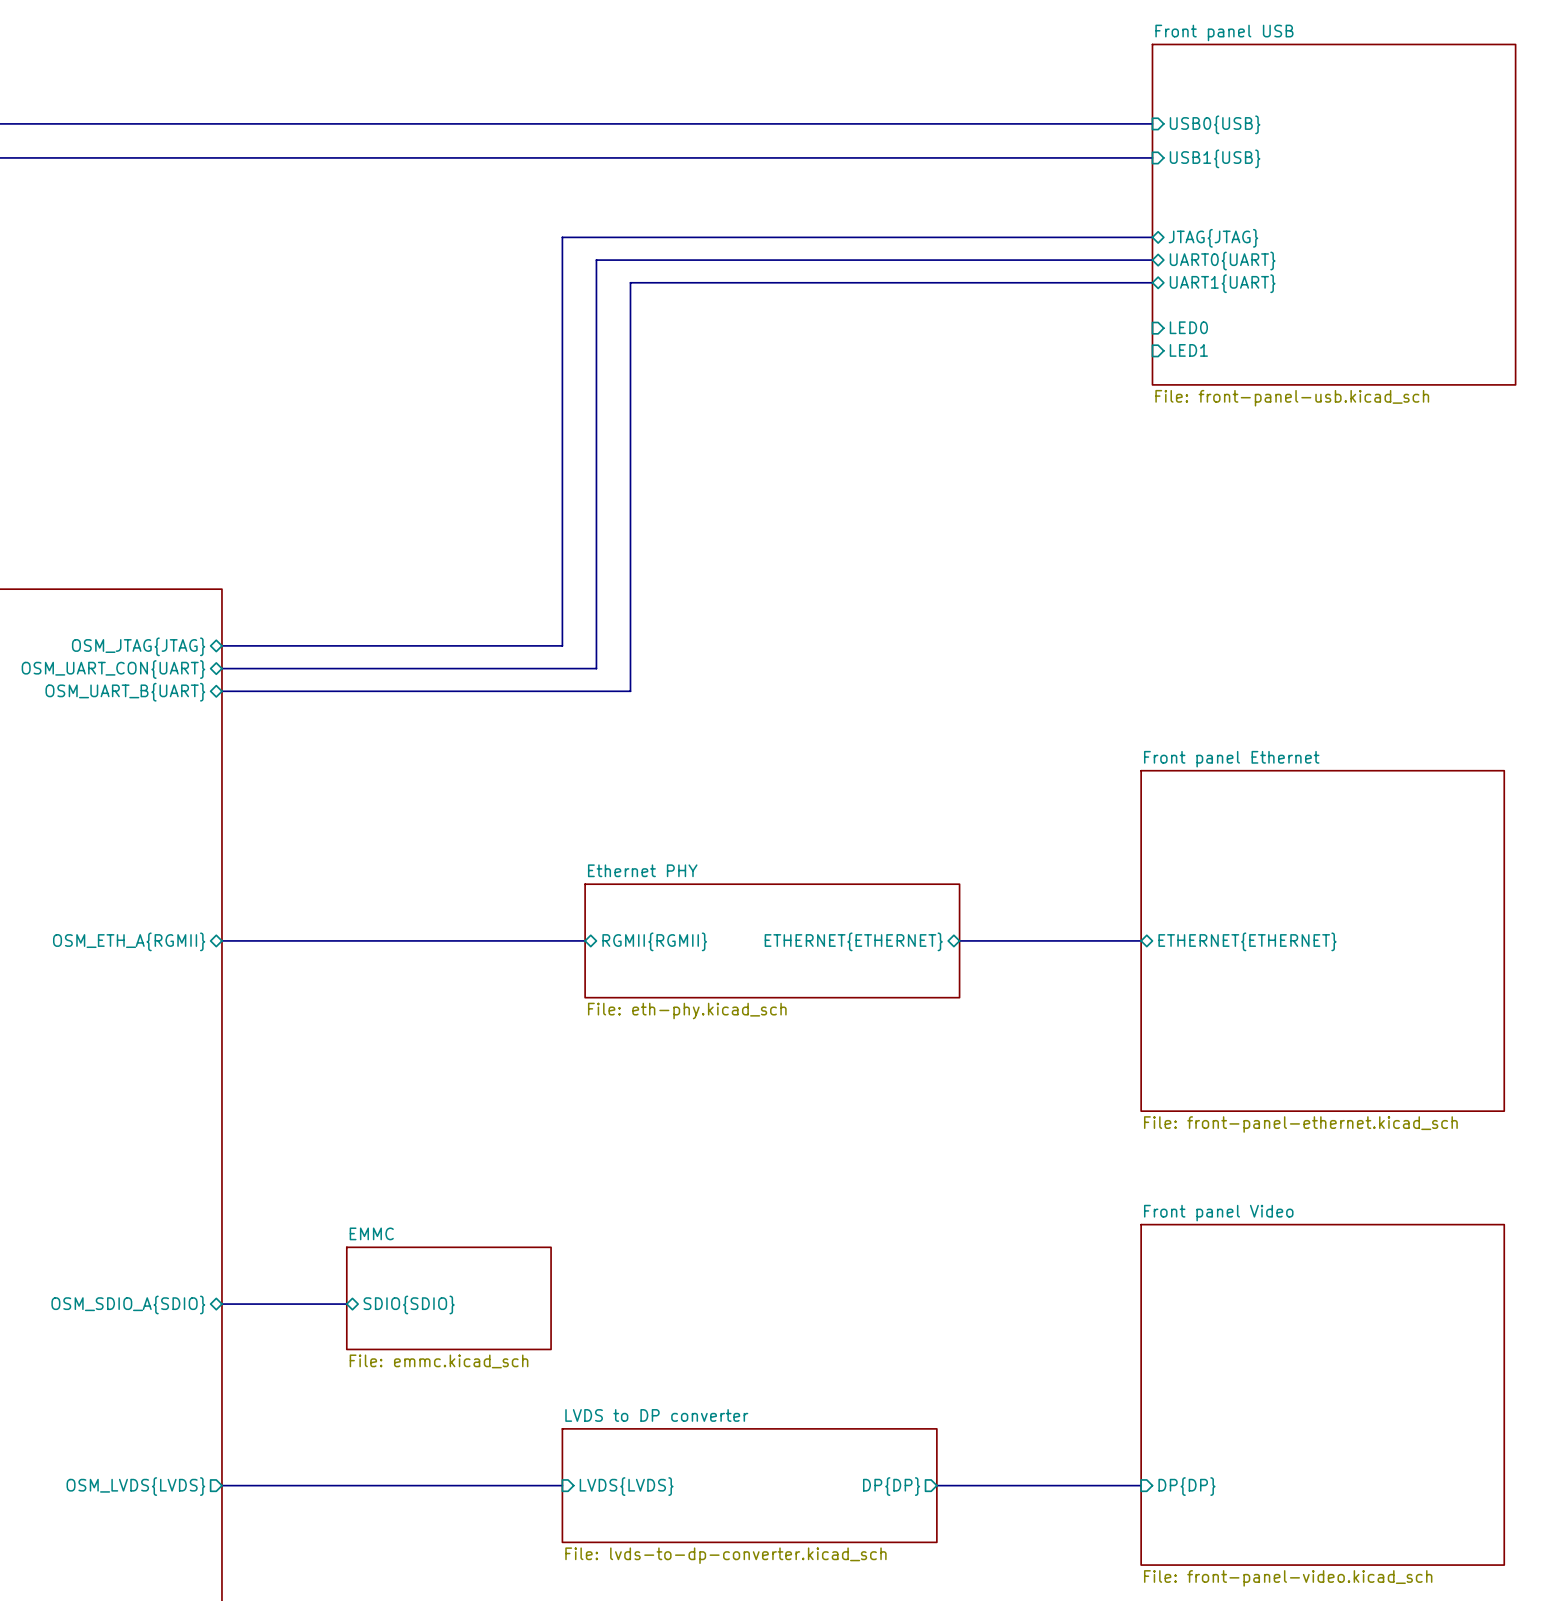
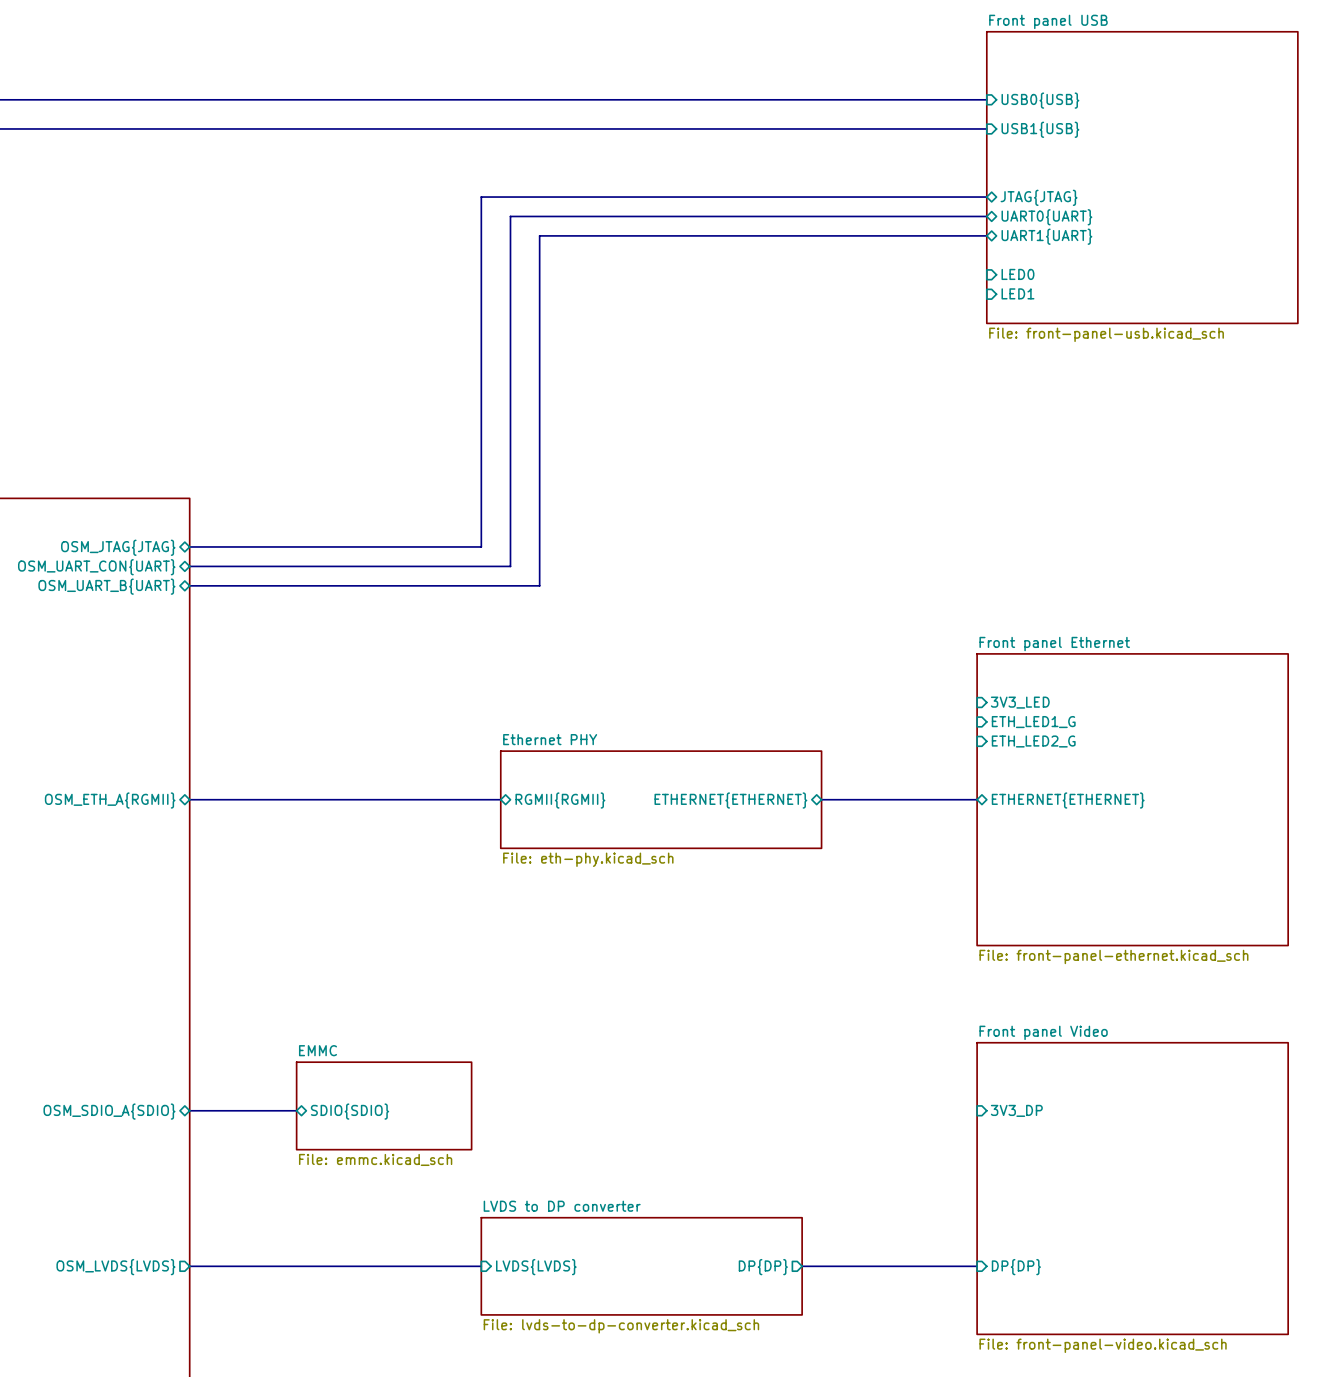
sheet pin: none -> 3V3_LED (1020, 702)
sheet pin: none -> ETH_LED1_G (1033, 722)
sheet pin: none -> ETH_LED2_G (1033, 741)
sheet pin: none -> 3V3_DP (1016, 1110)

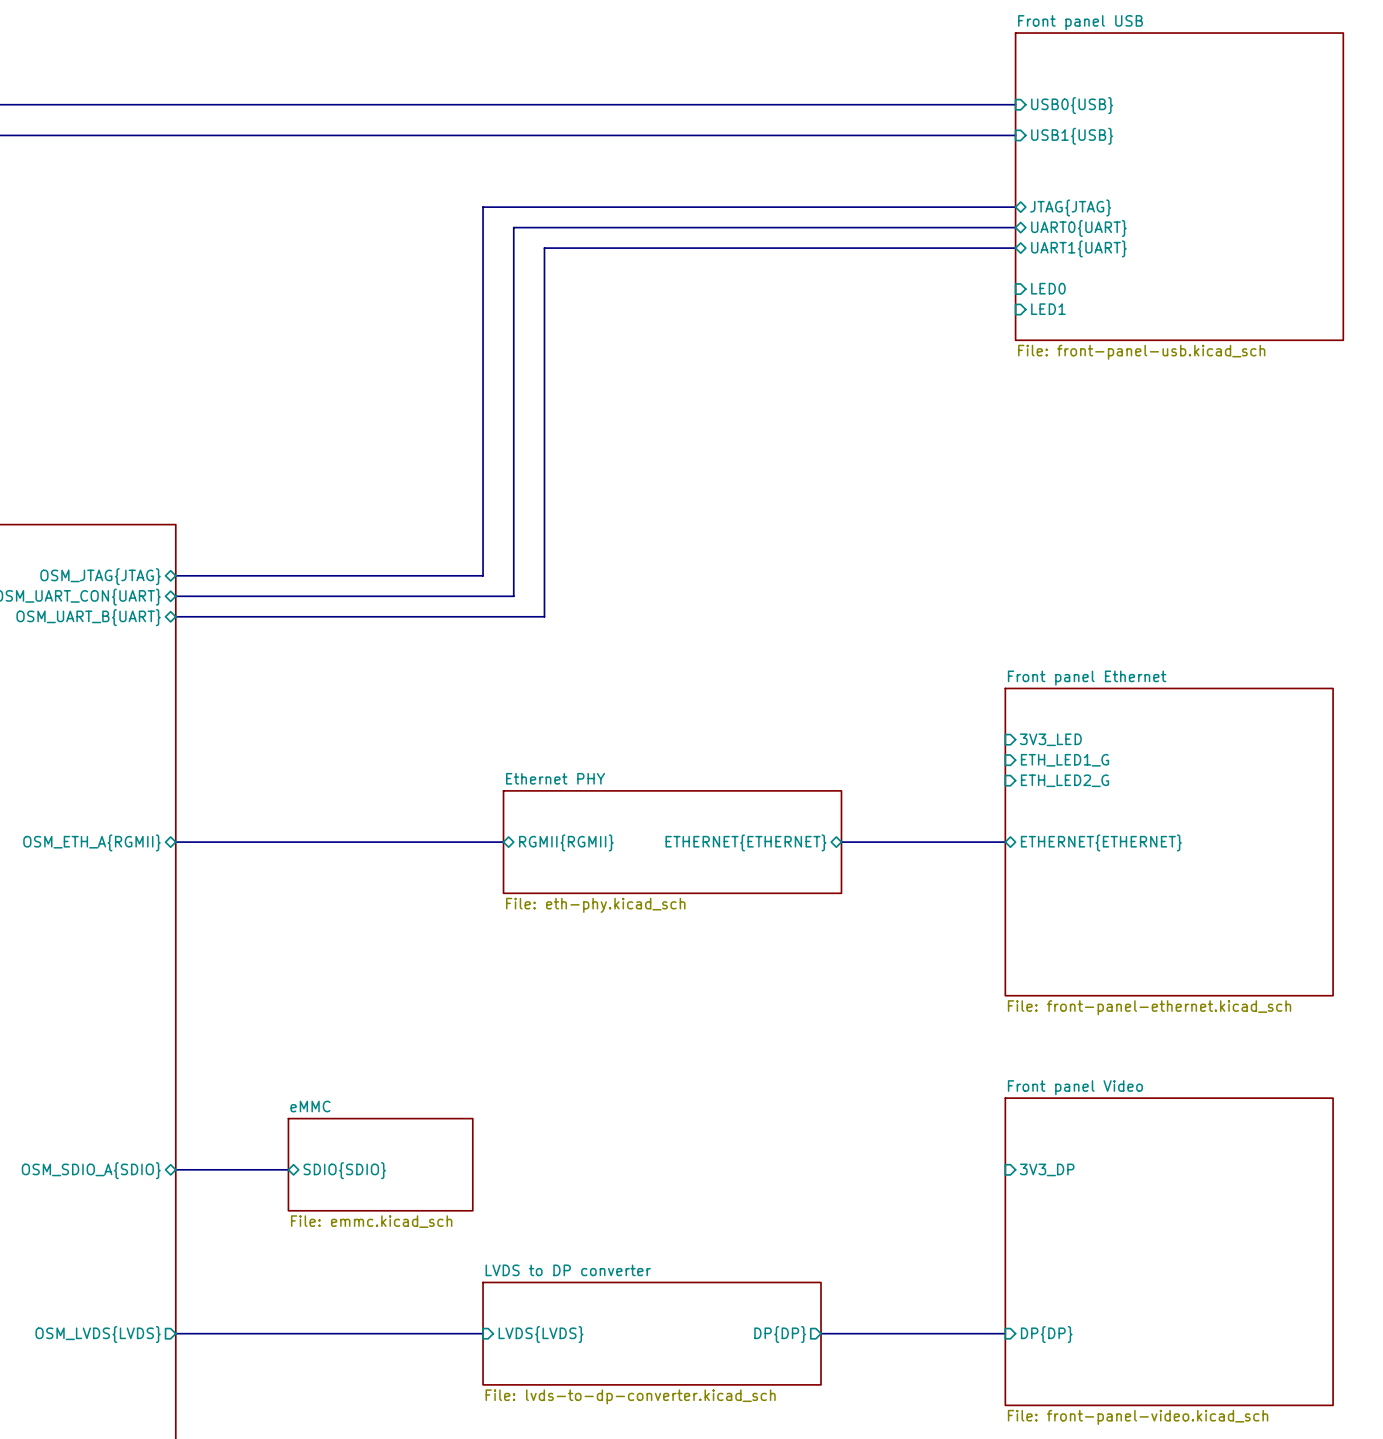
sheet EMMC name: EMMC (317, 1050) -> eMMC (310, 1106)

